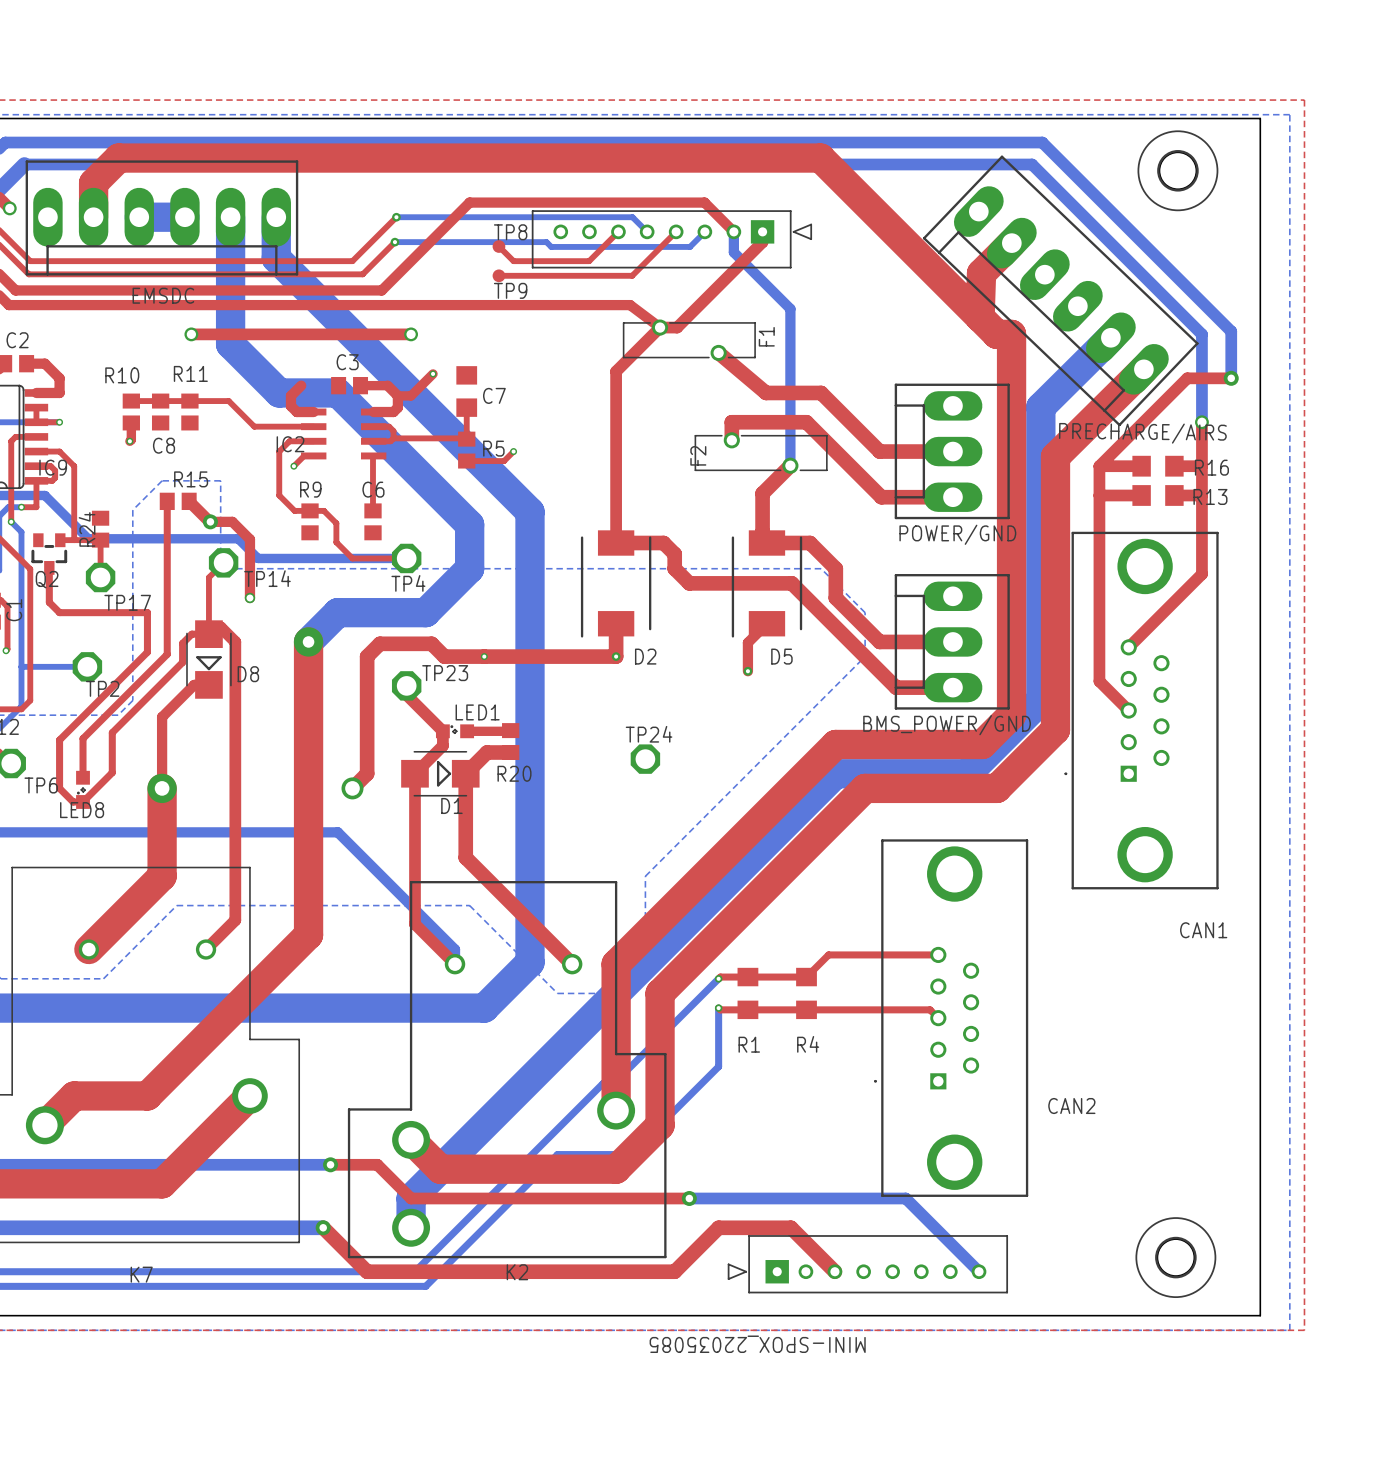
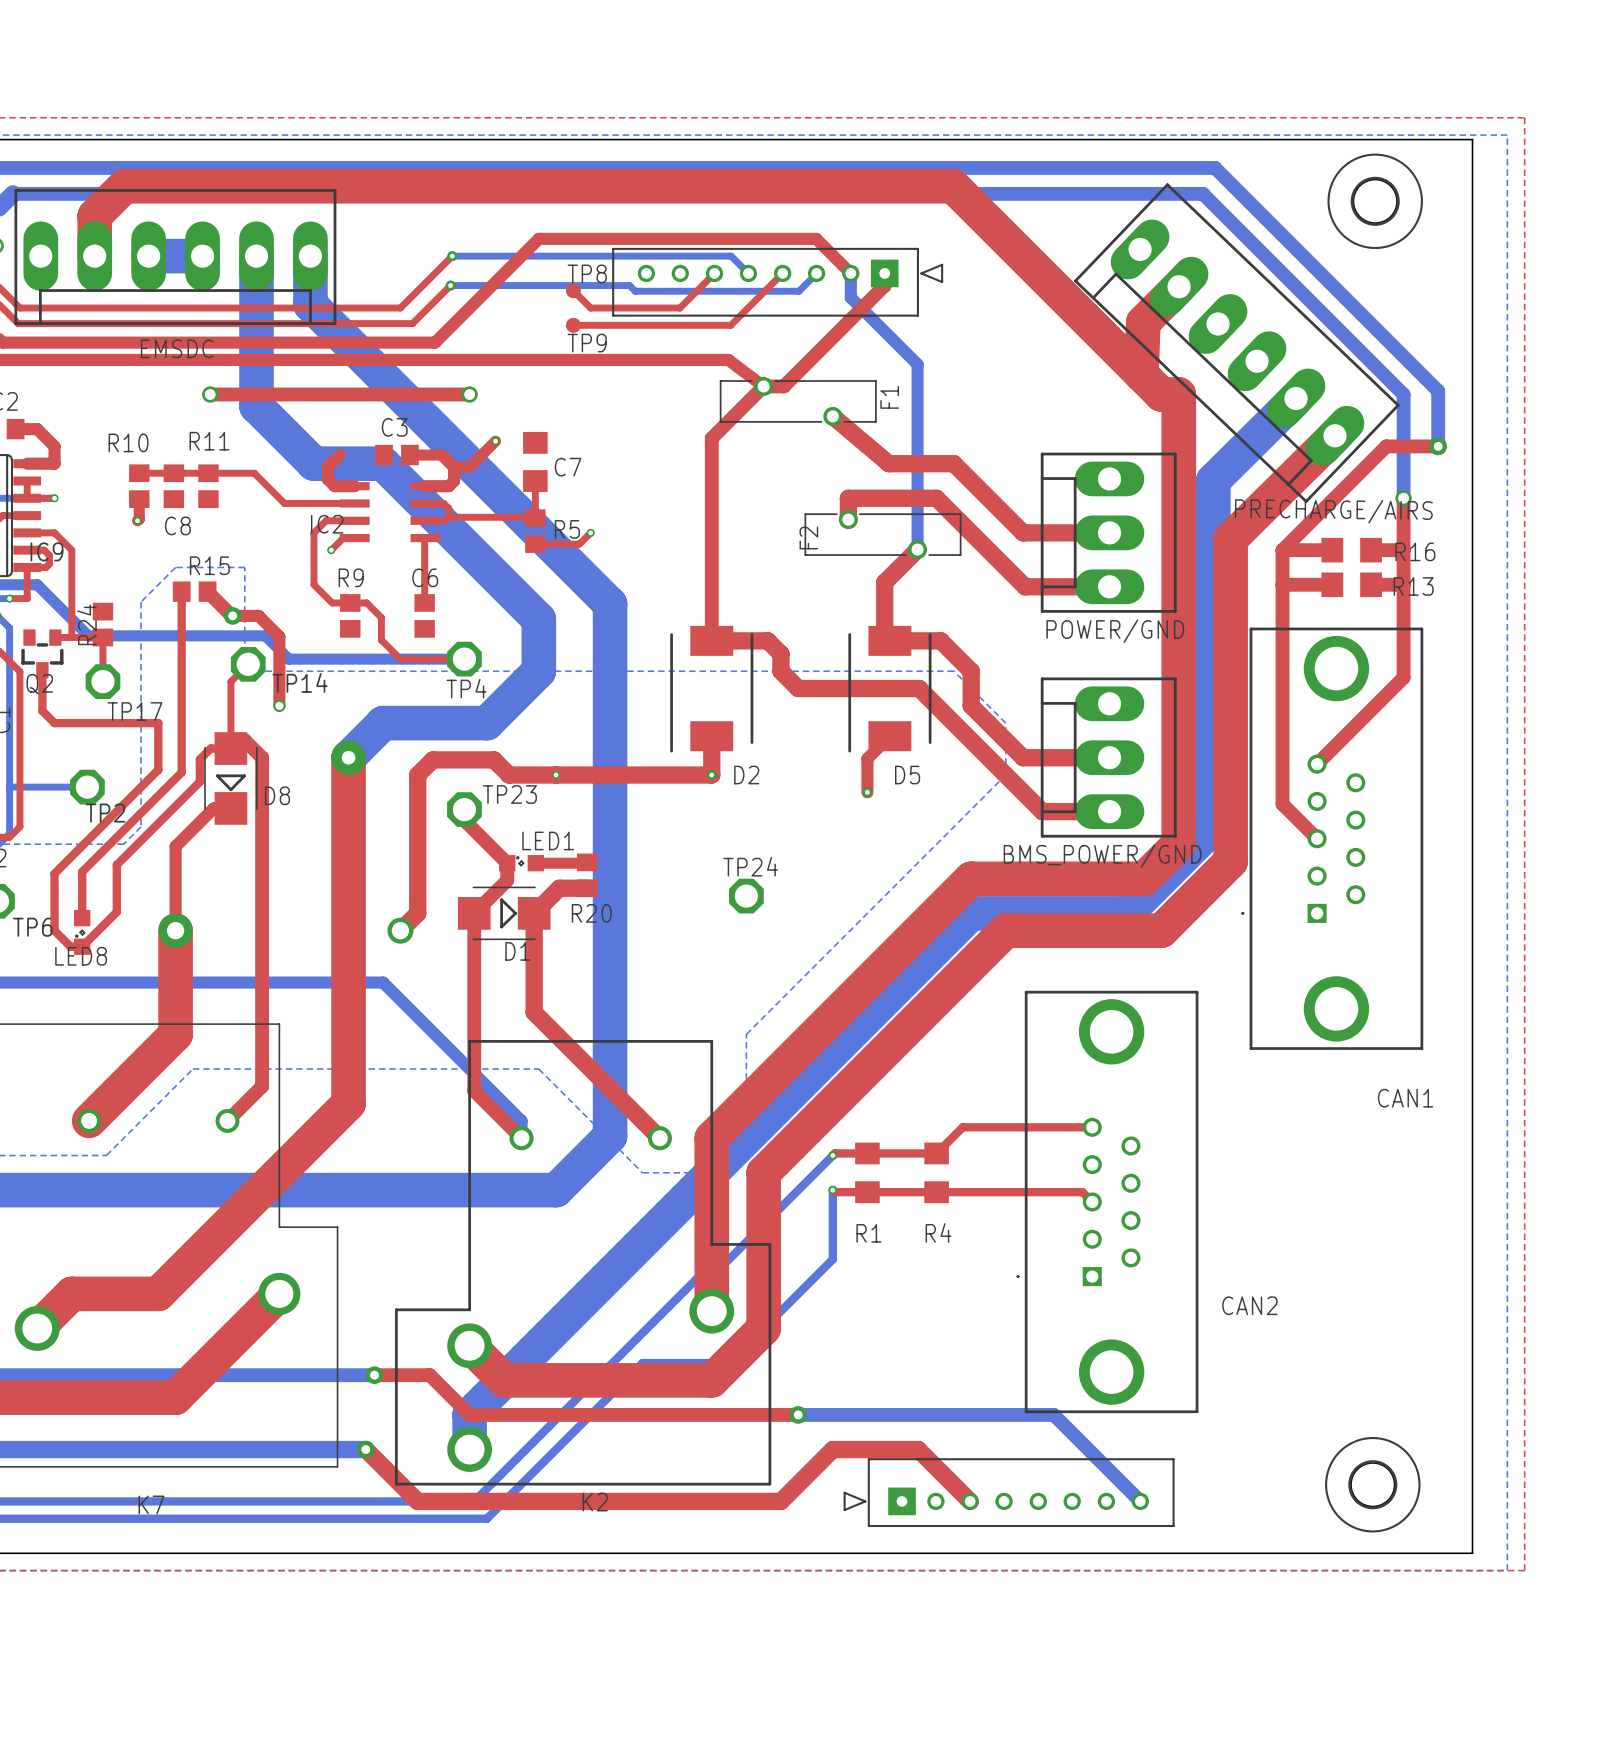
part value: MINI-SPOX_22035085 (757, 1344) -> none

